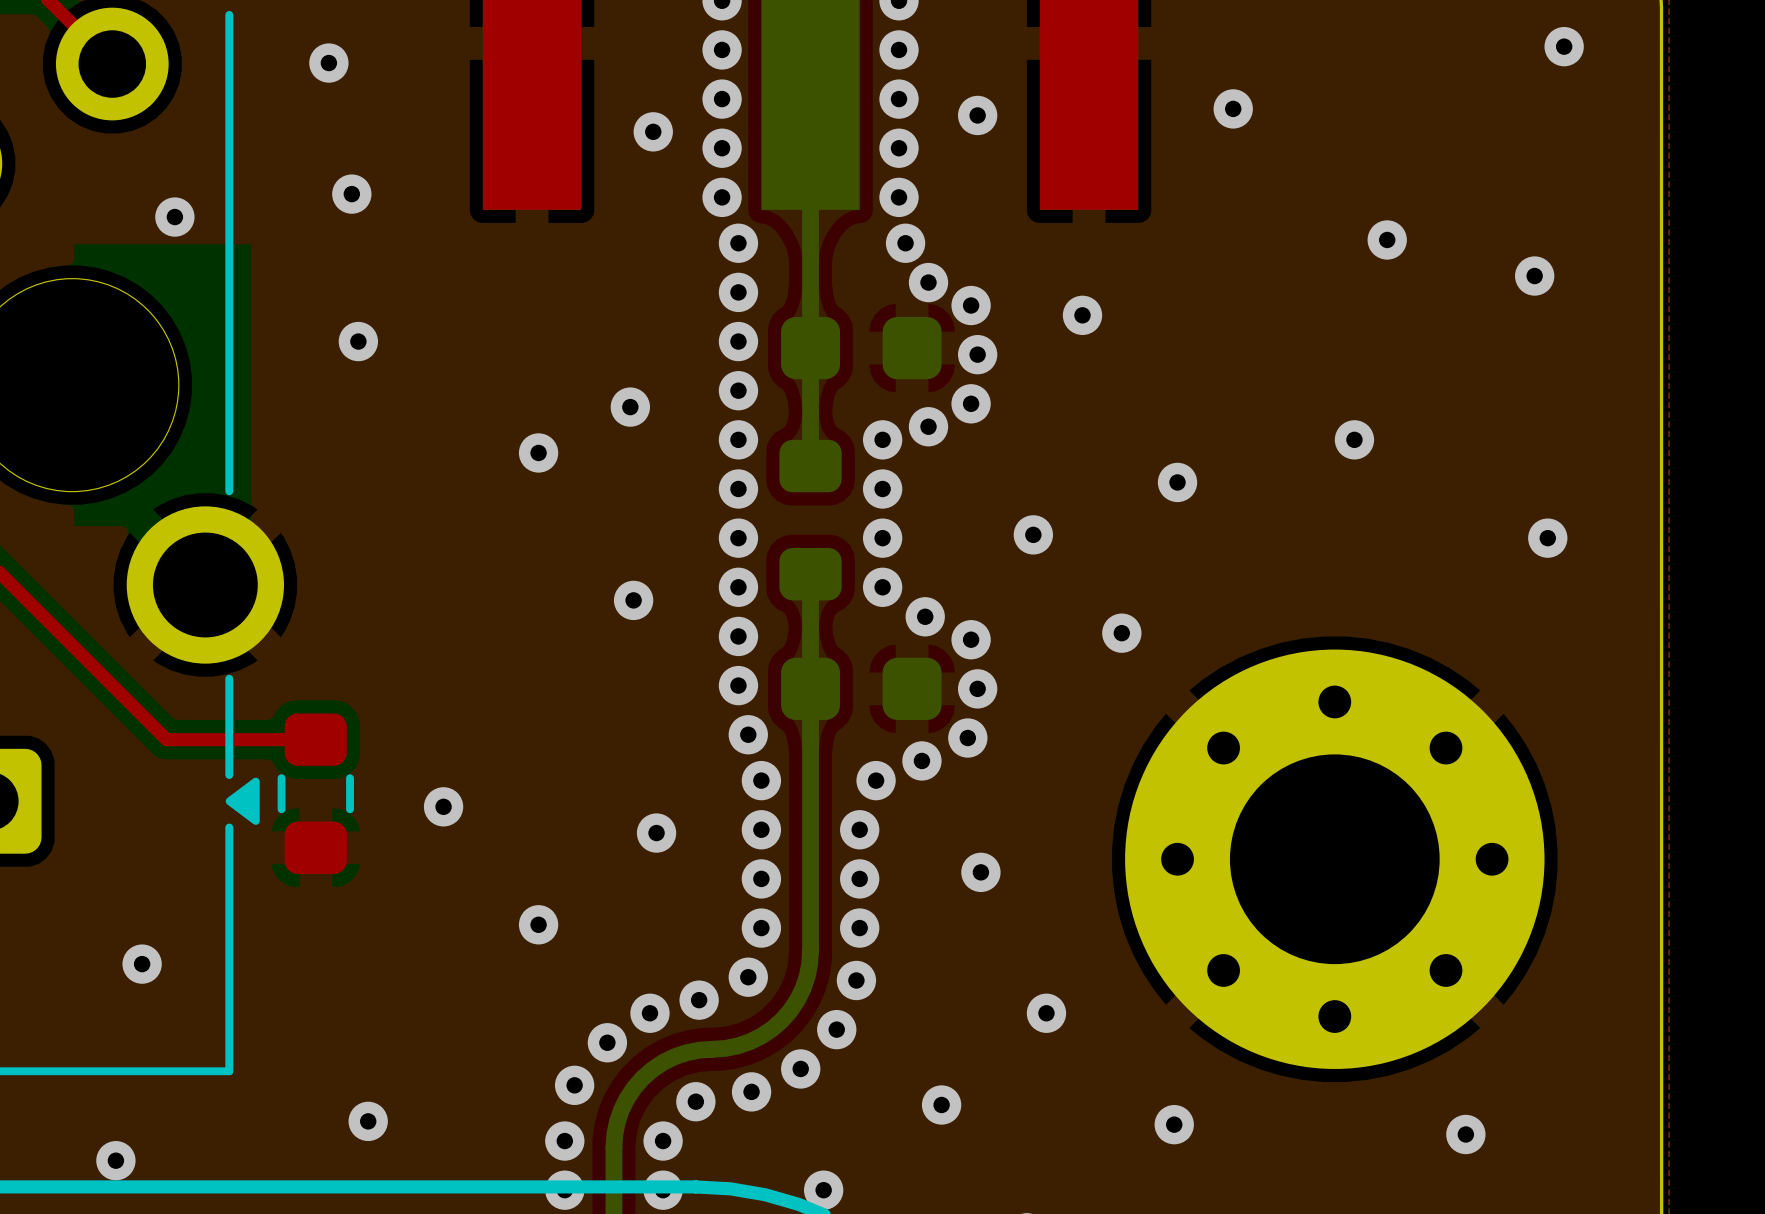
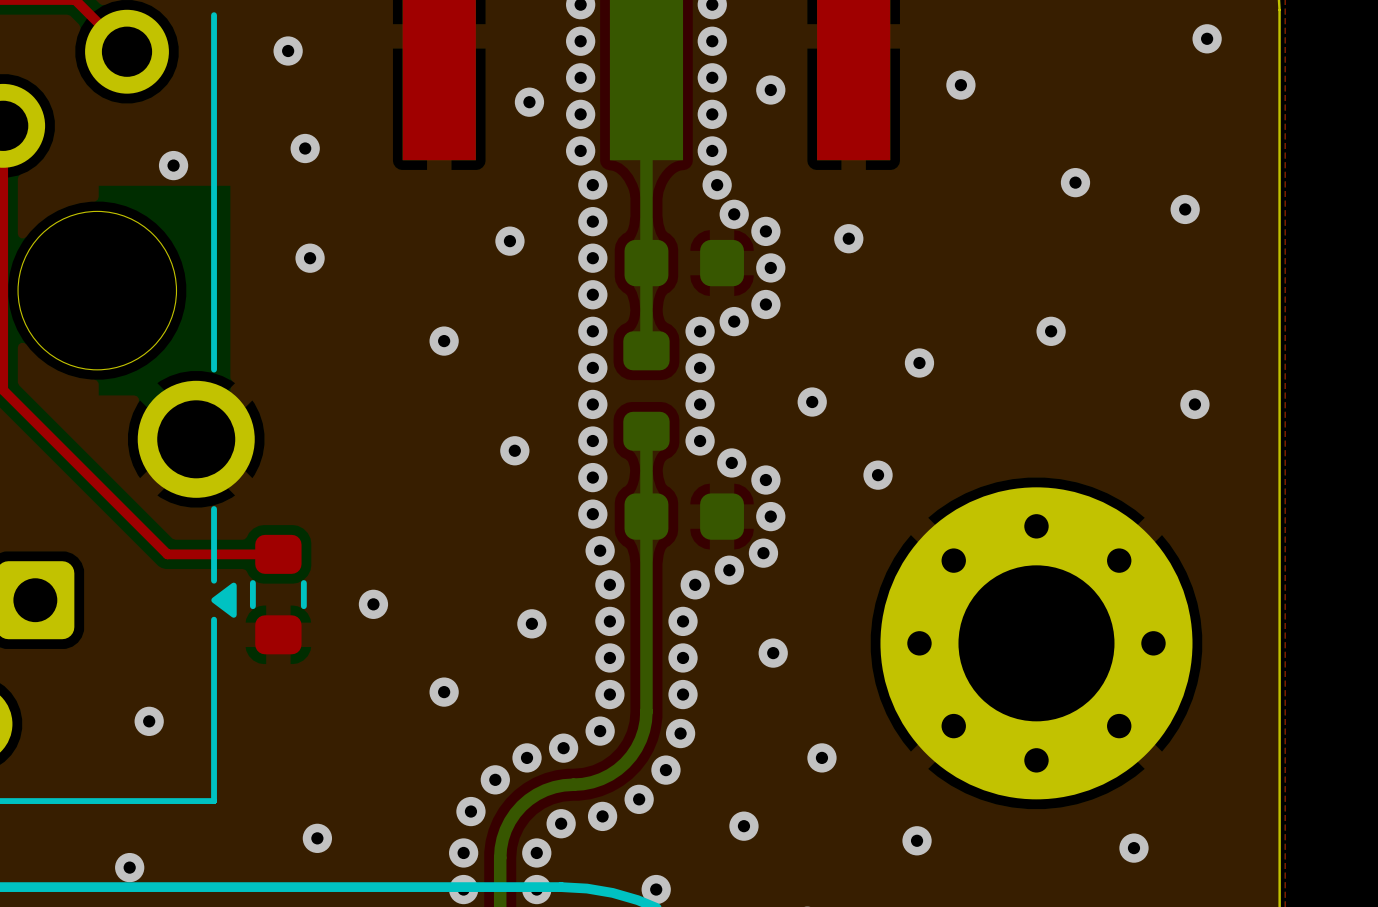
via position: (630, 407) -> (509, 241)

